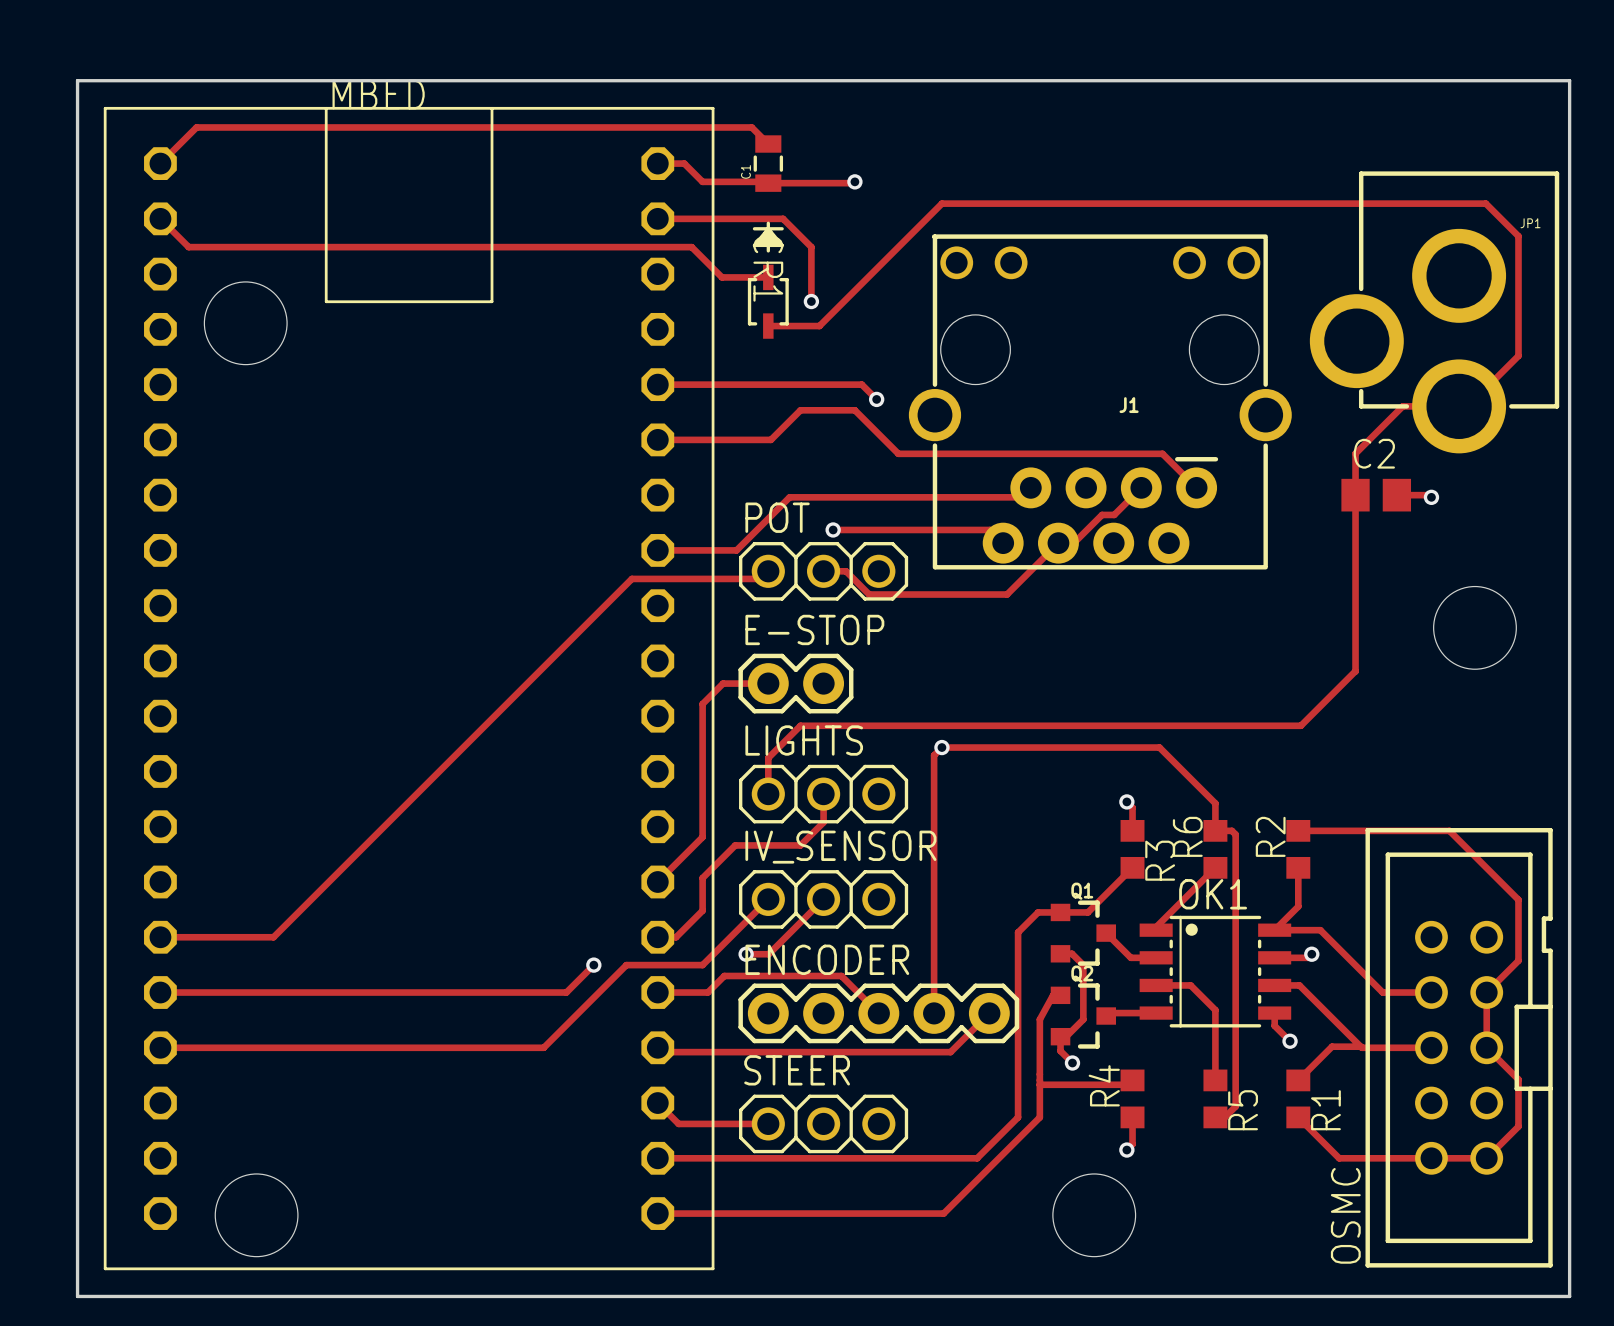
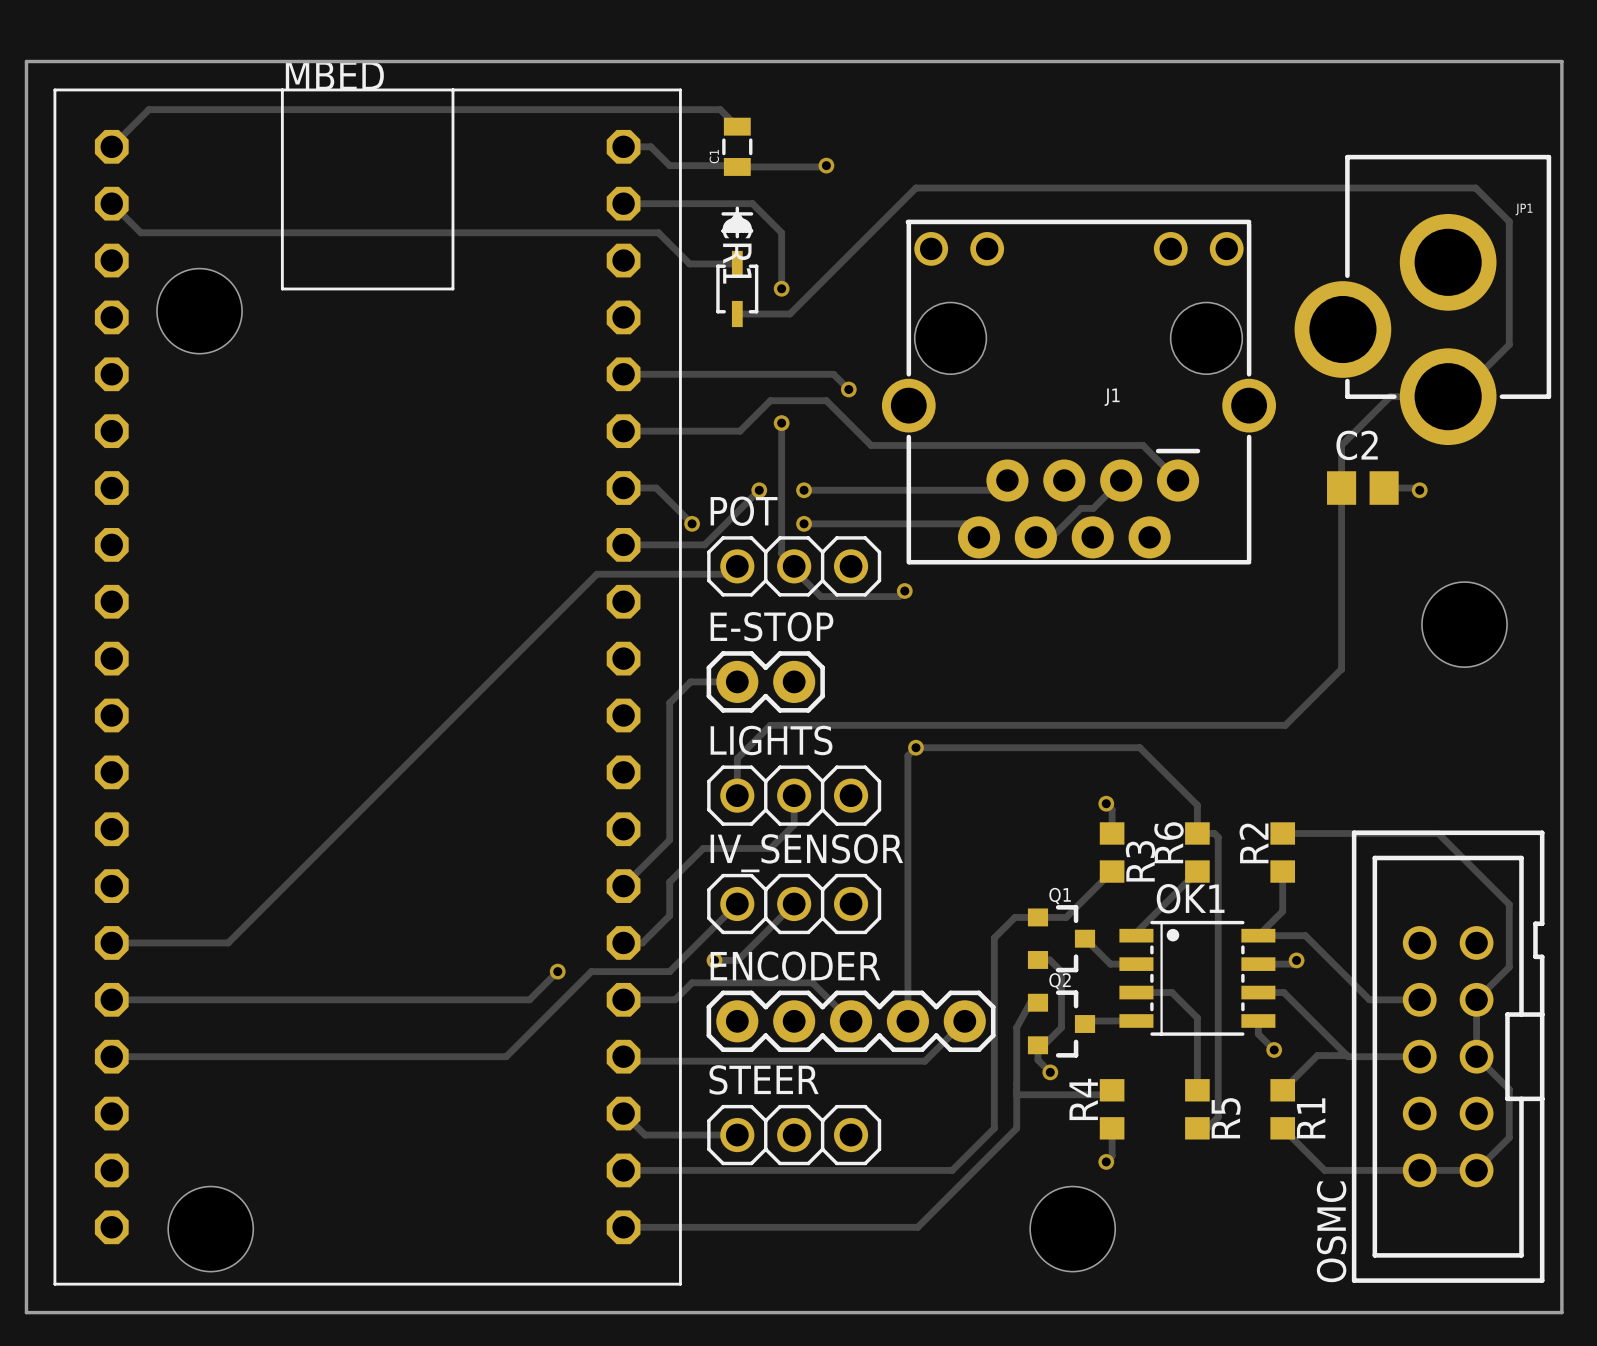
track: none -> (781, 423) (781, 553) (794, 566) (794, 569) (820, 596) (899, 596) (904, 591)
via: none -> (781, 423)
track: none -> (623, 488) (656, 488) (692, 523)
track: (789, 497) (833, 497) -> none
via: none -> (759, 490)
via: none -> (804, 490)
via: none -> (692, 523)
track: (1058, 543) (1007, 594) (869, 594) (846, 571) (823, 571) -> none
via: none -> (904, 591)

